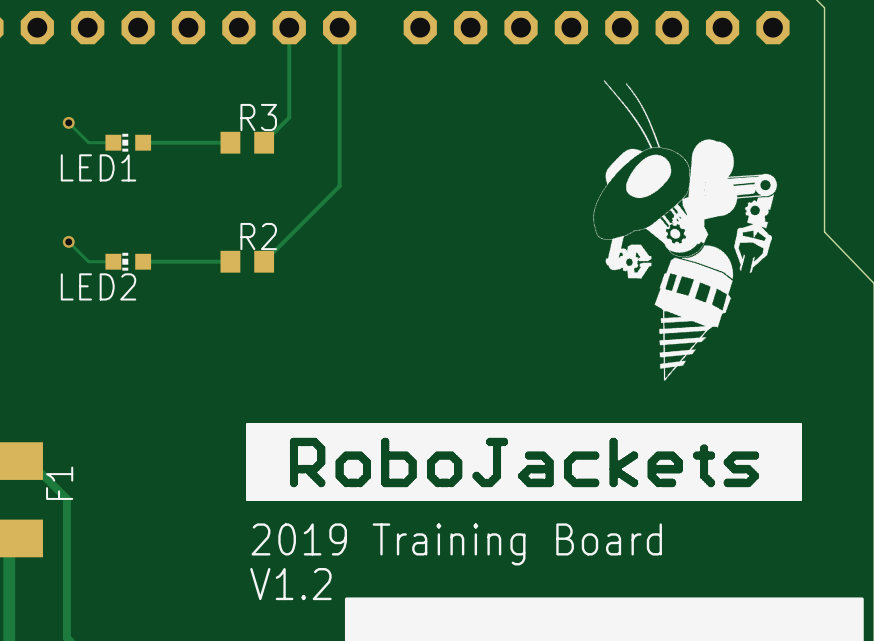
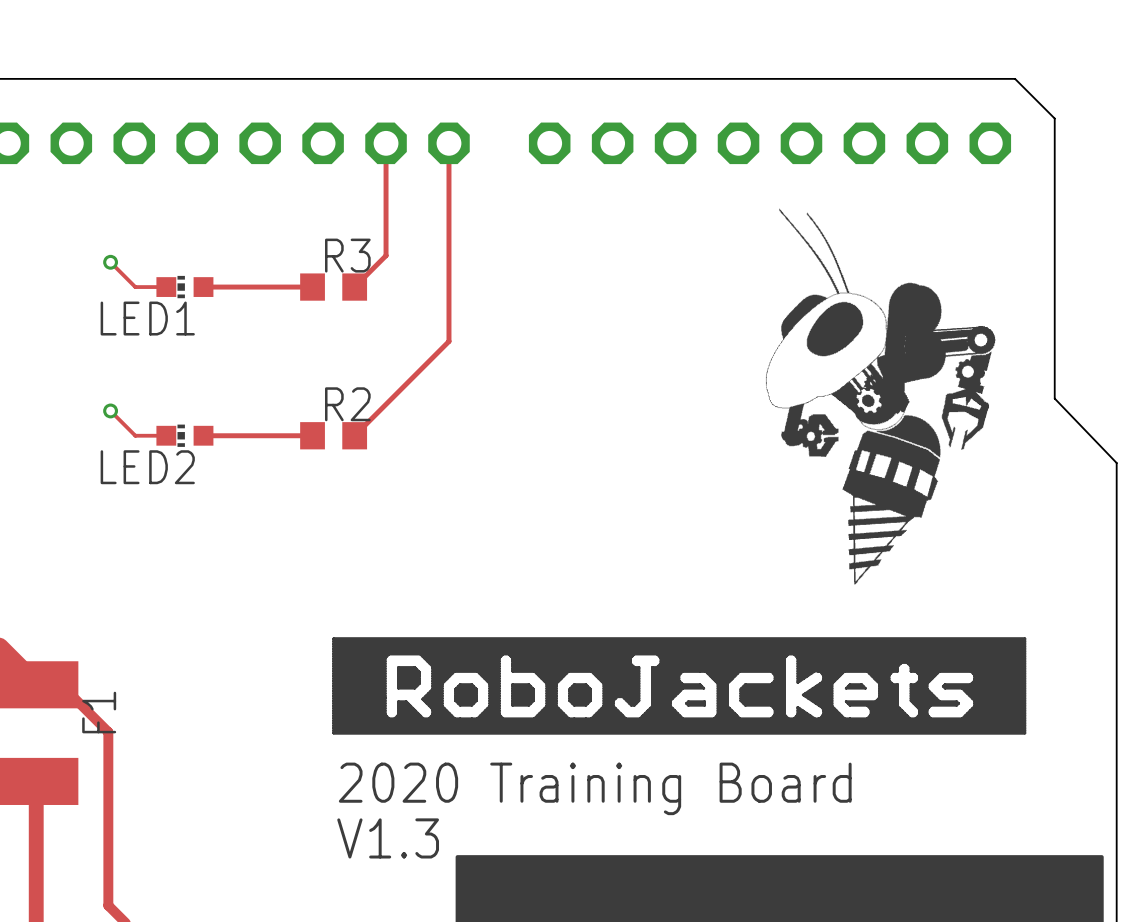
text: 2019 Training Board (456, 544) -> 2020 Training Board (595, 788)
text: V1.2 (290, 584) -> V1.3 (388, 838)

